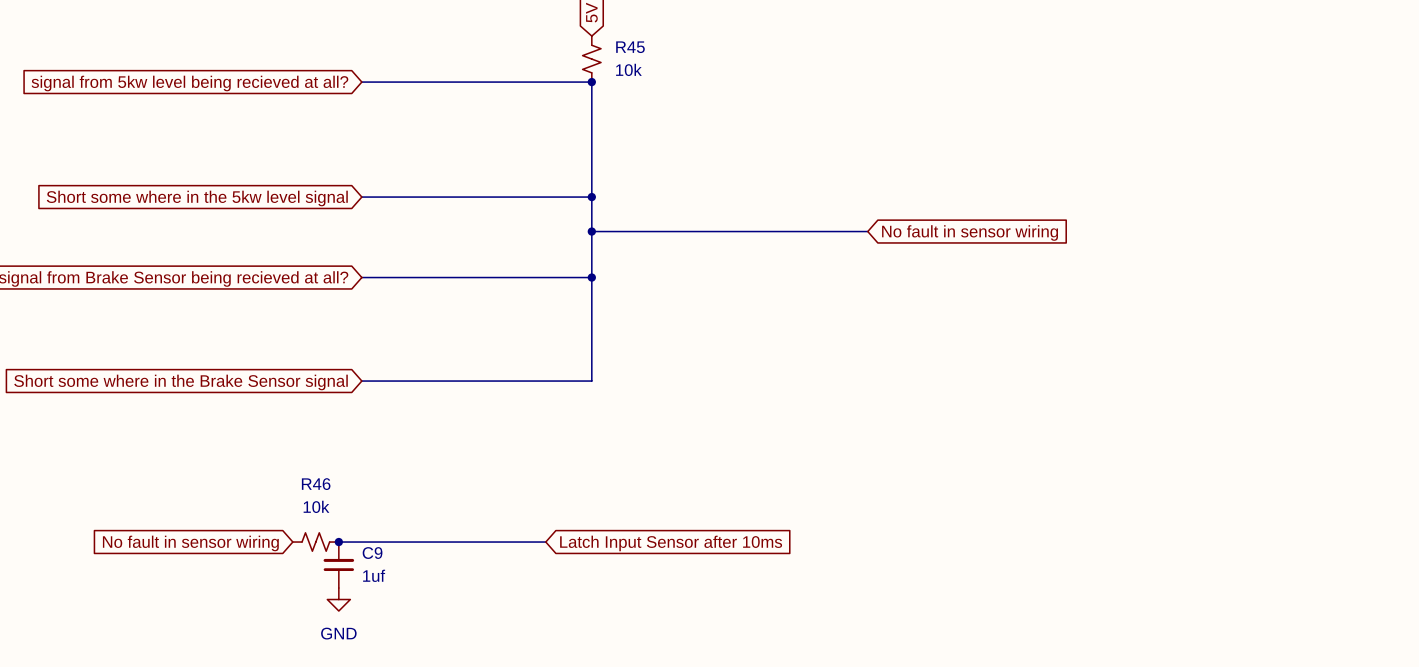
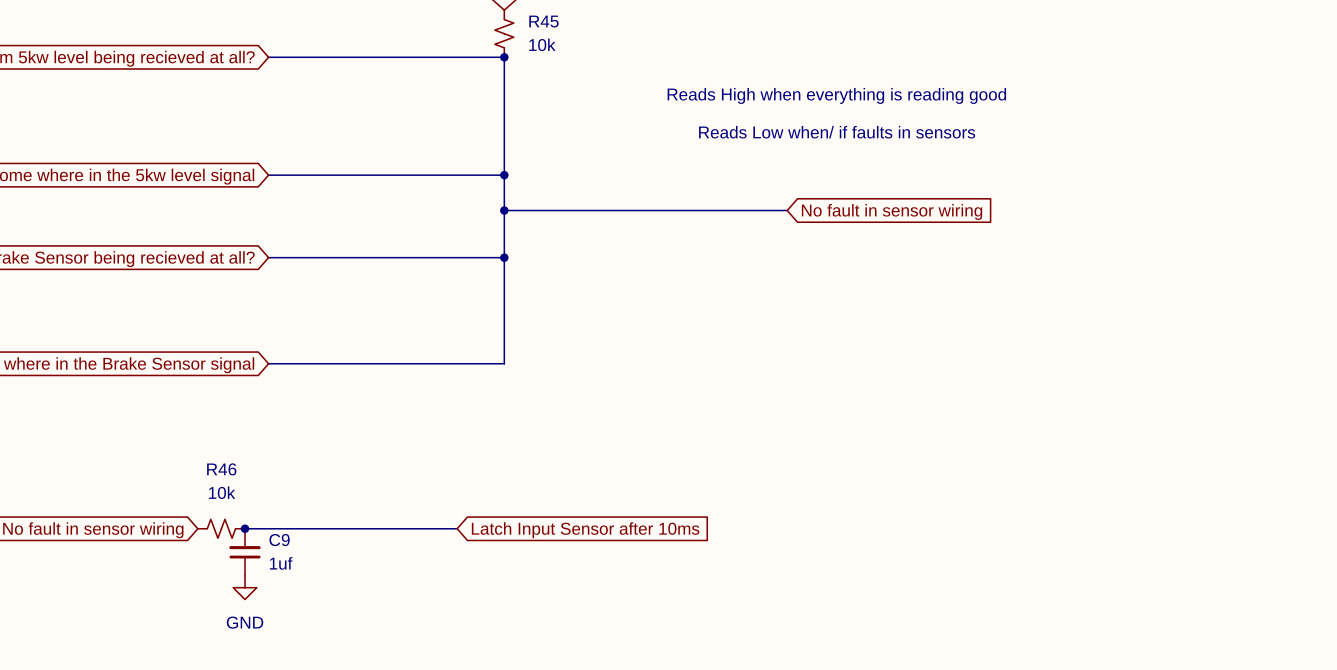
text: none -> Reads High when everything is reading good (836, 95)
text: none -> Reads Low when/ if faults in sensors (837, 132)

